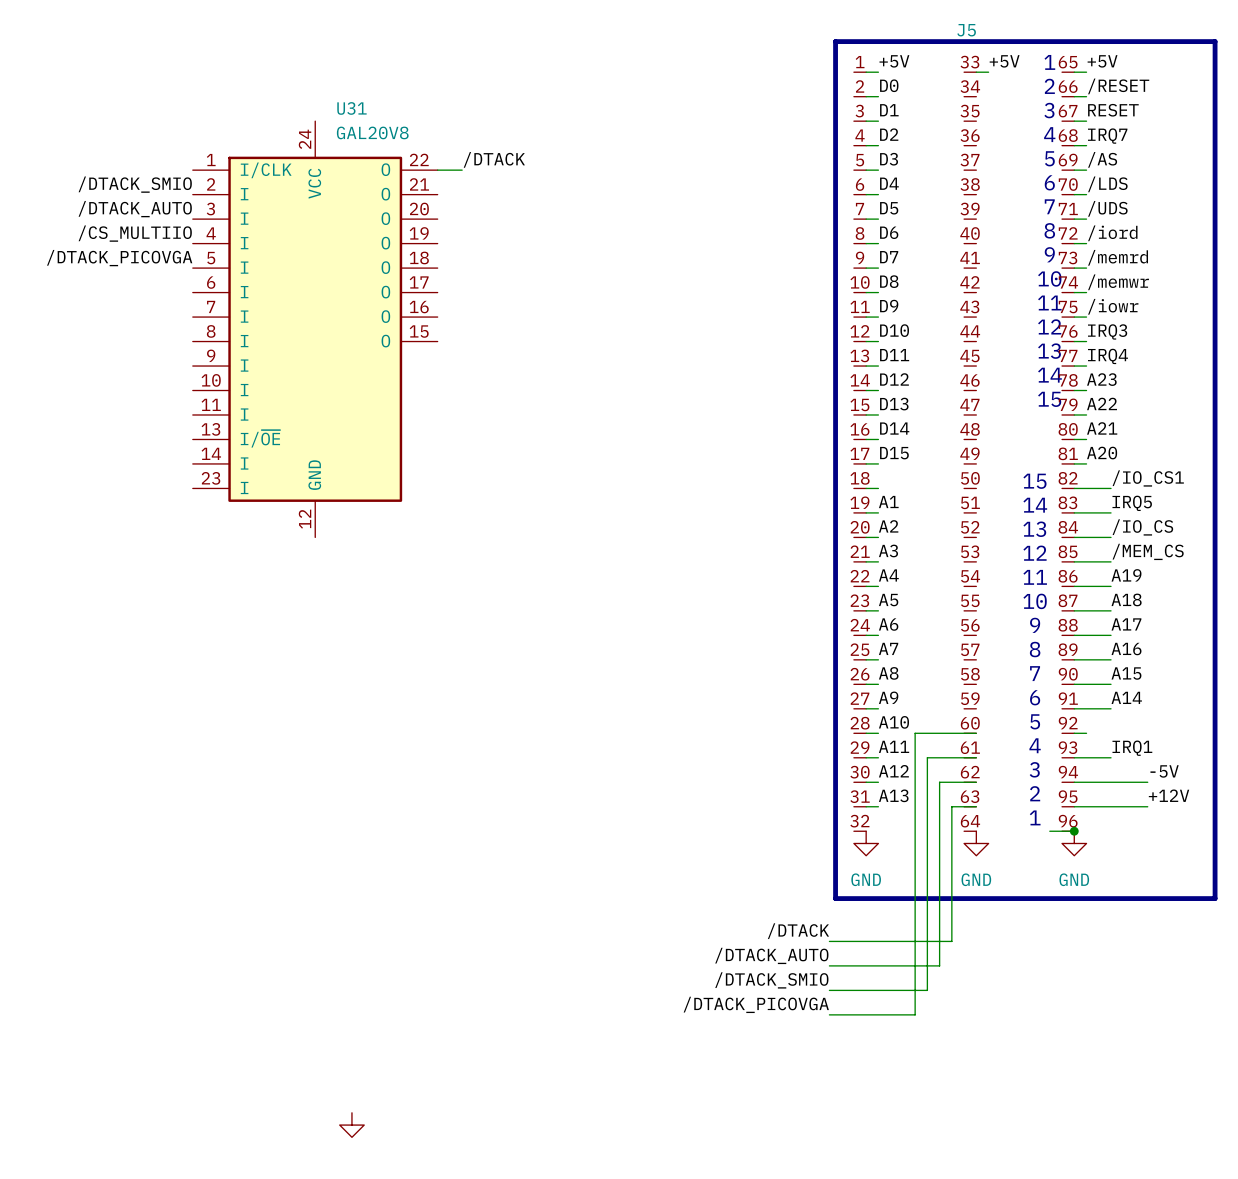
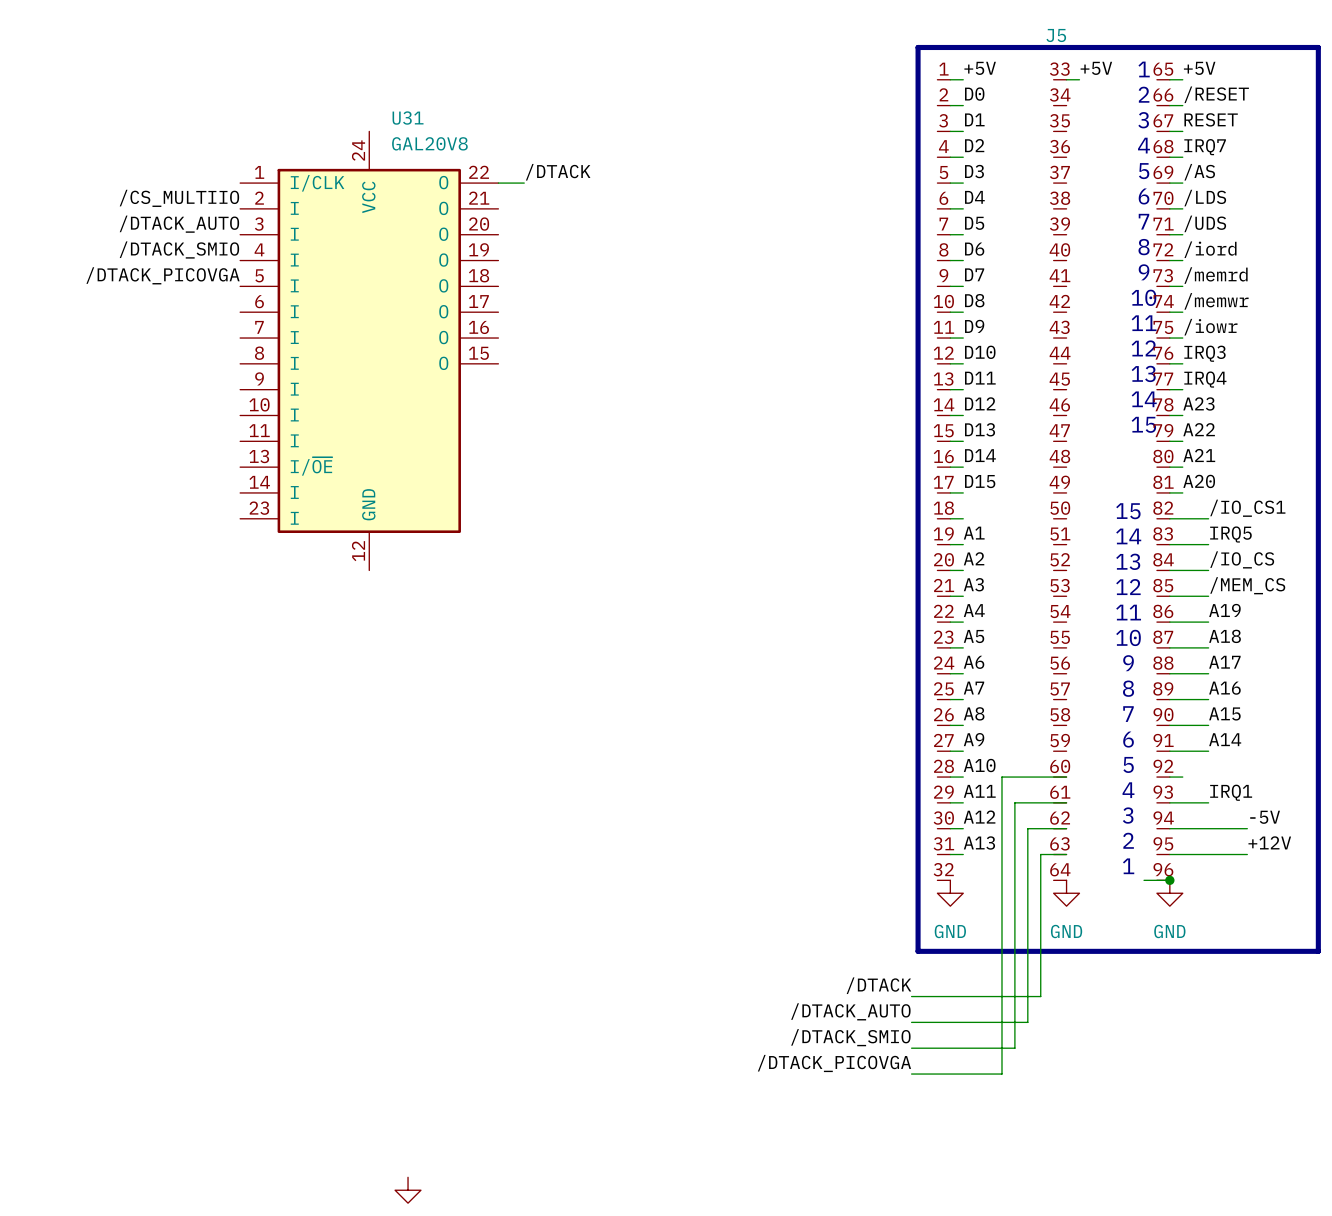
label: /DTACK_SMIO (135, 184) -> /CS_MULTIIO (179, 198)
label: /CS_MULTIIO (135, 233) -> /DTACK_SMIO (179, 250)

